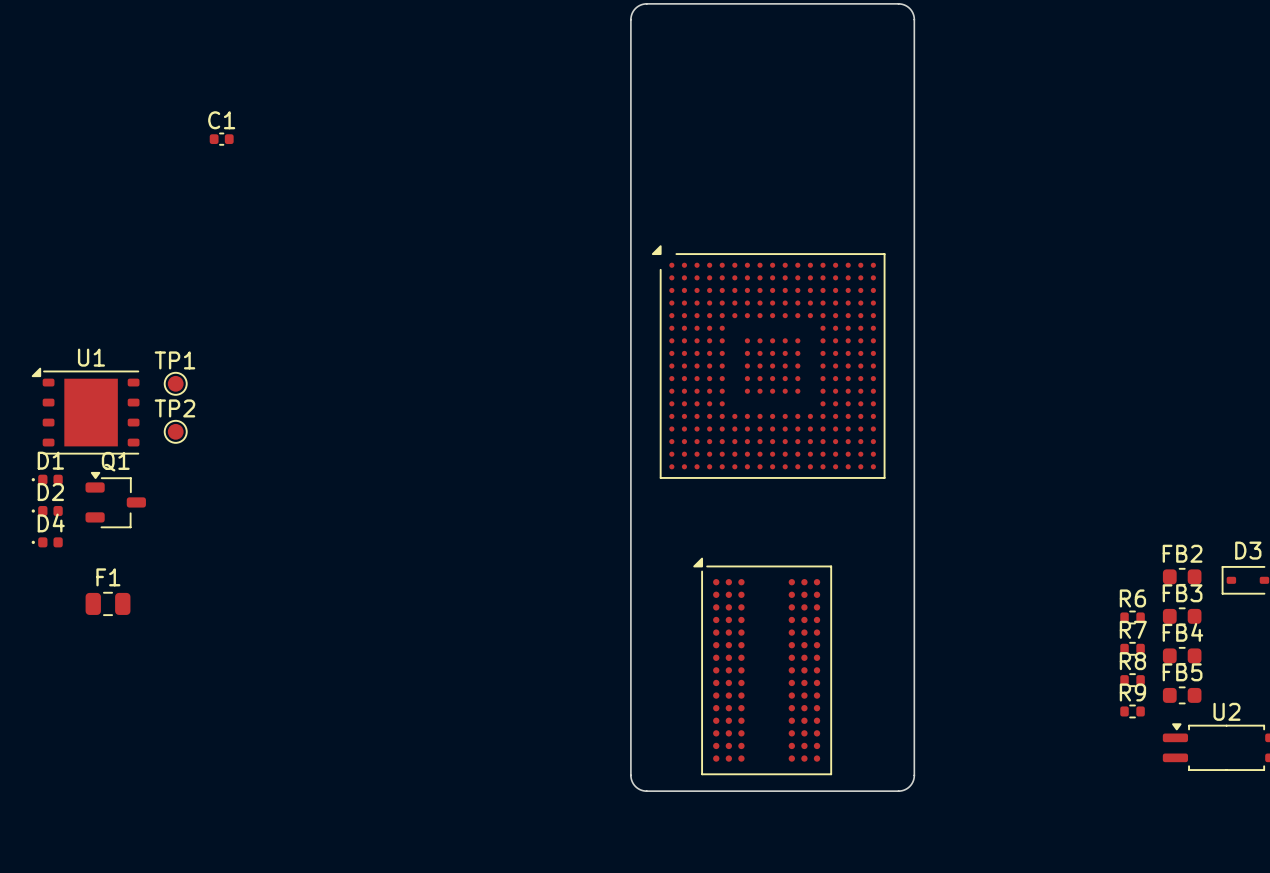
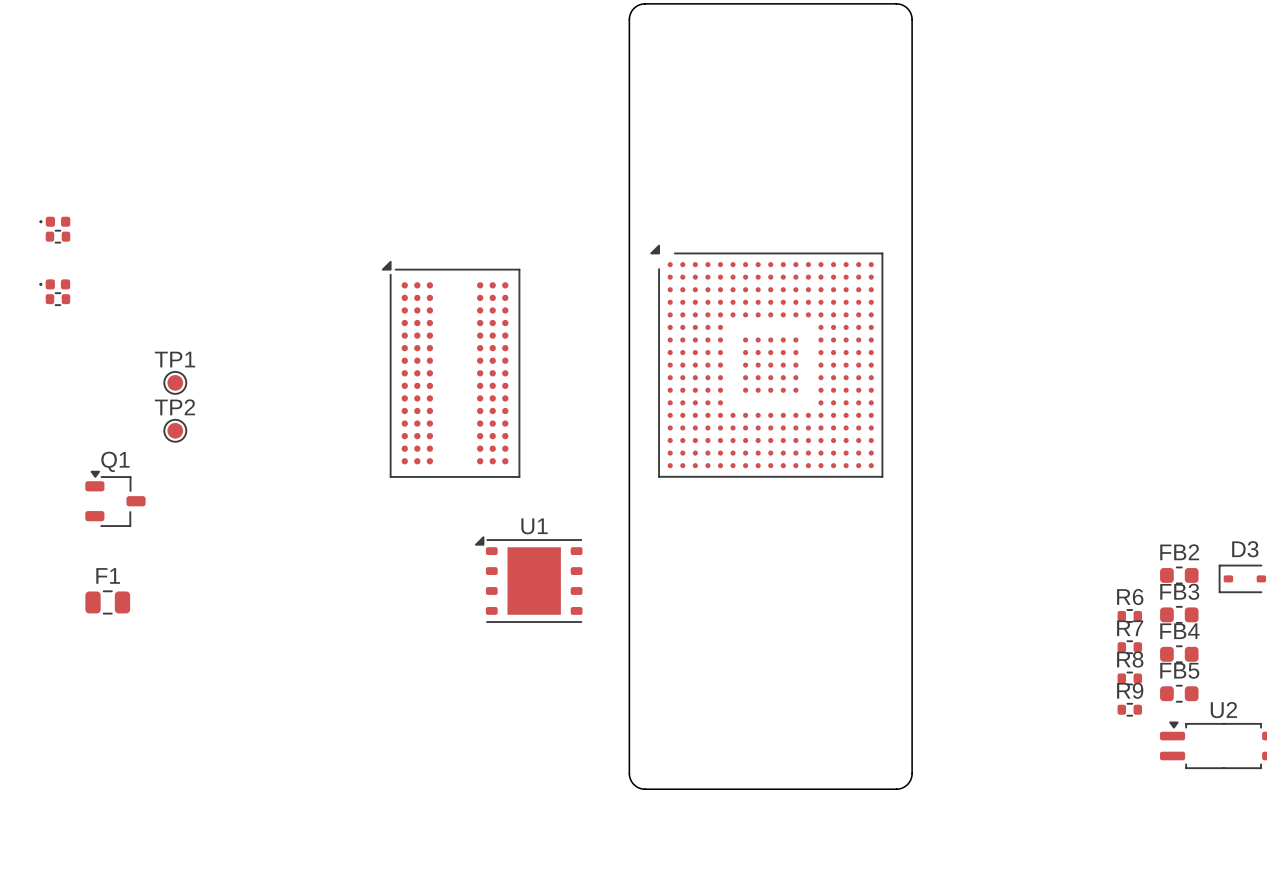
C1: (221, 139) -> none
part: none -> (54, 221)
part: none -> (57, 236)
part: none -> (54, 284)
part: none -> (57, 299)
part: none -> (451, 369)
U1 position: (85, 411) -> (528, 579)
D1: (47, 479) -> none
D2: (47, 511) -> none
D4: (47, 542) -> none
part: (762, 666) -> none

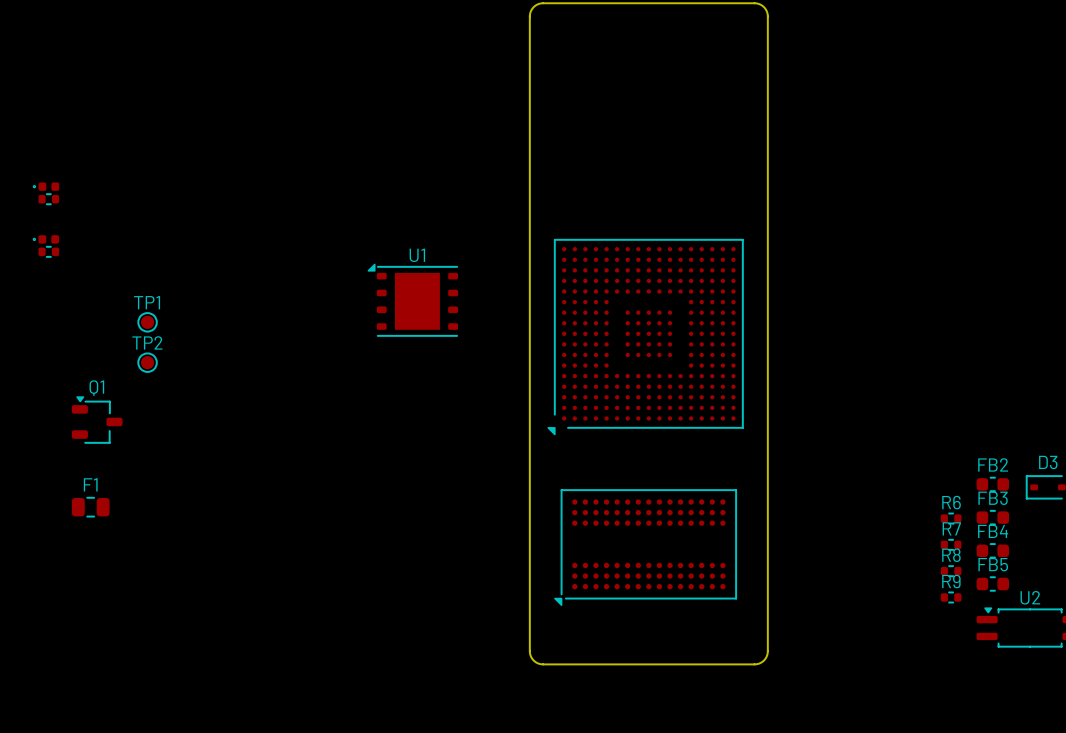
part rotation: 0° (766, 361) -> 90° counterclockwise (645, 337)
part: (451, 369) -> none
U1 position: (528, 579) -> (412, 300)
part: none -> (645, 547)

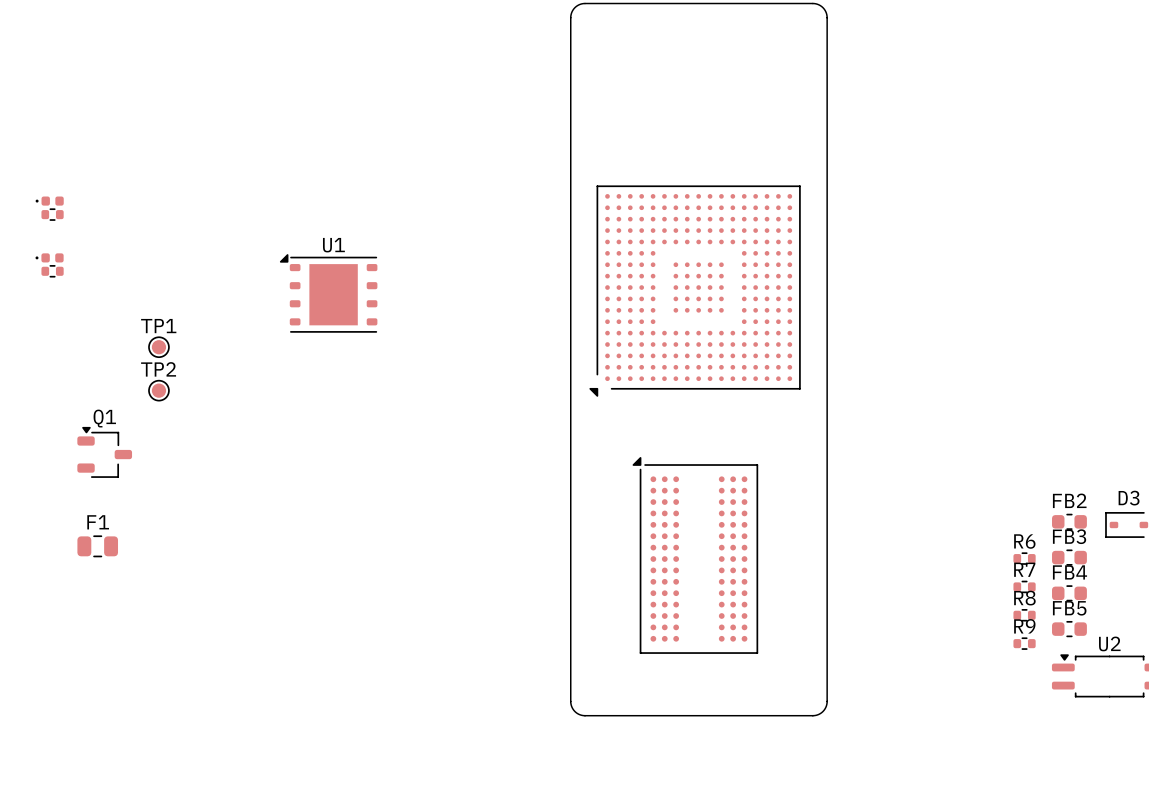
U1 position: (412, 300) -> (328, 293)
part position: (645, 337) -> (695, 291)
part rotation: 0° (645, 547) -> 90° clockwise (695, 555)

